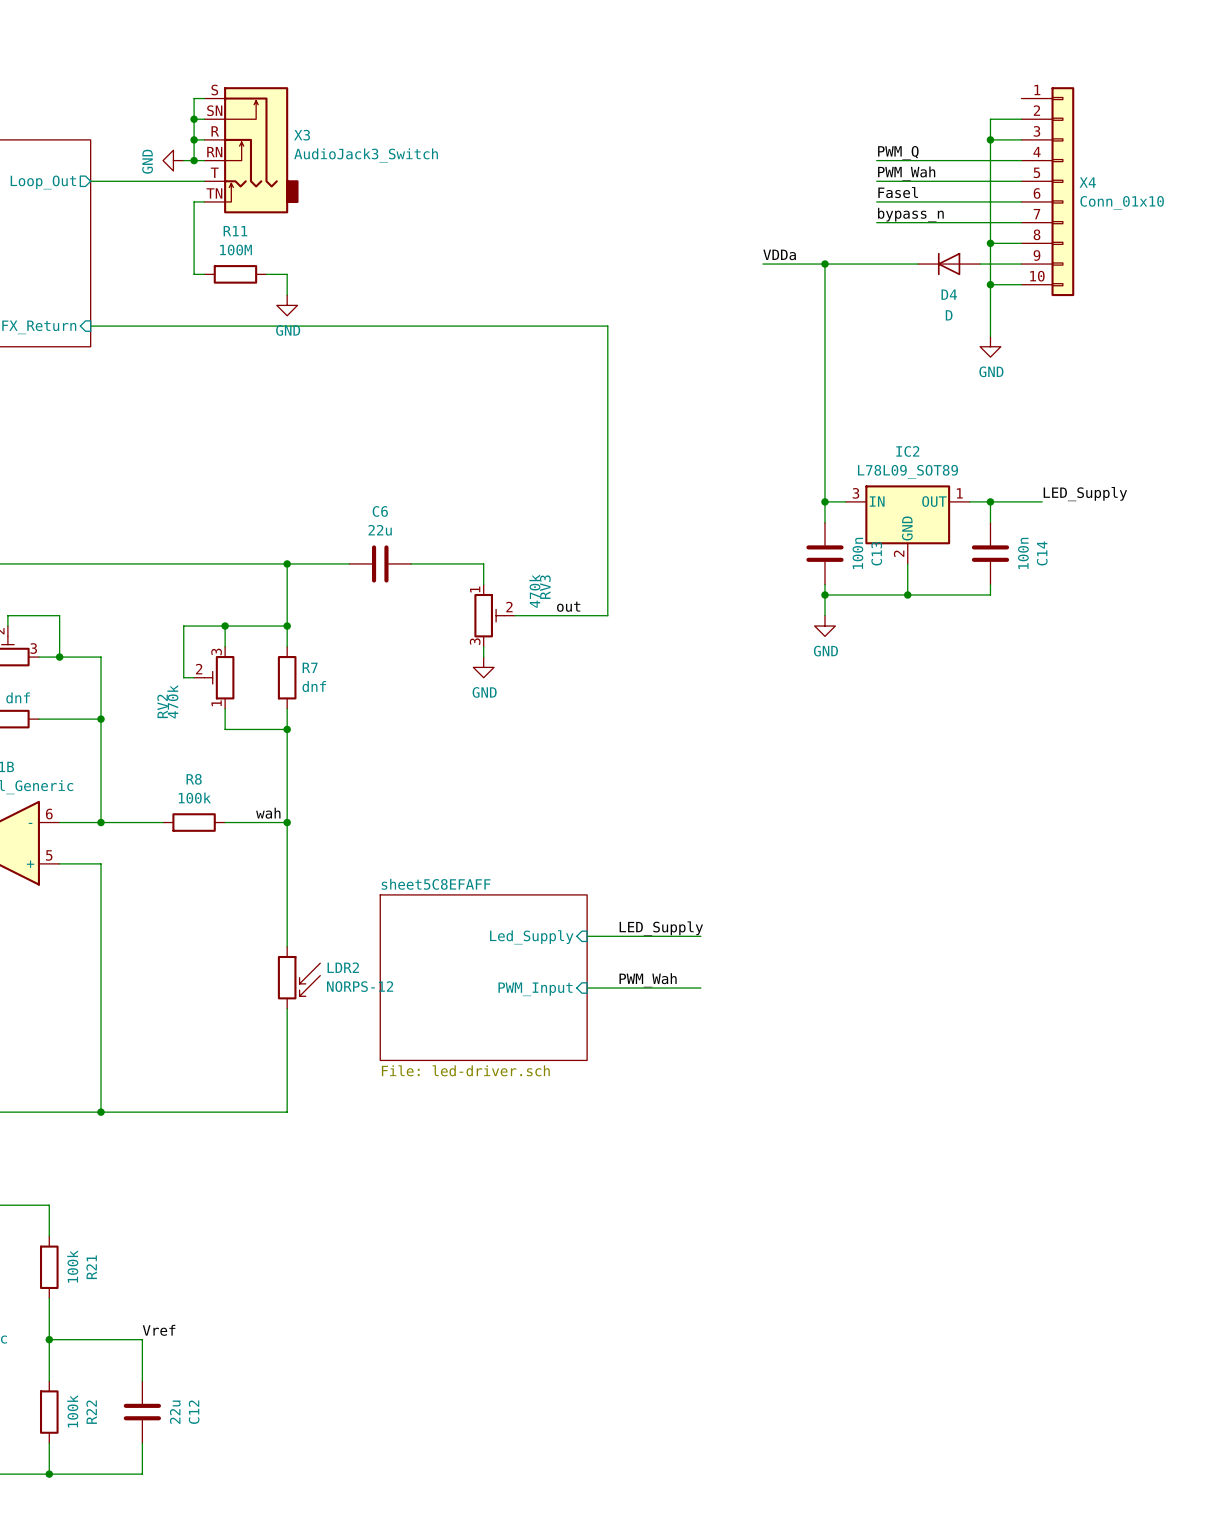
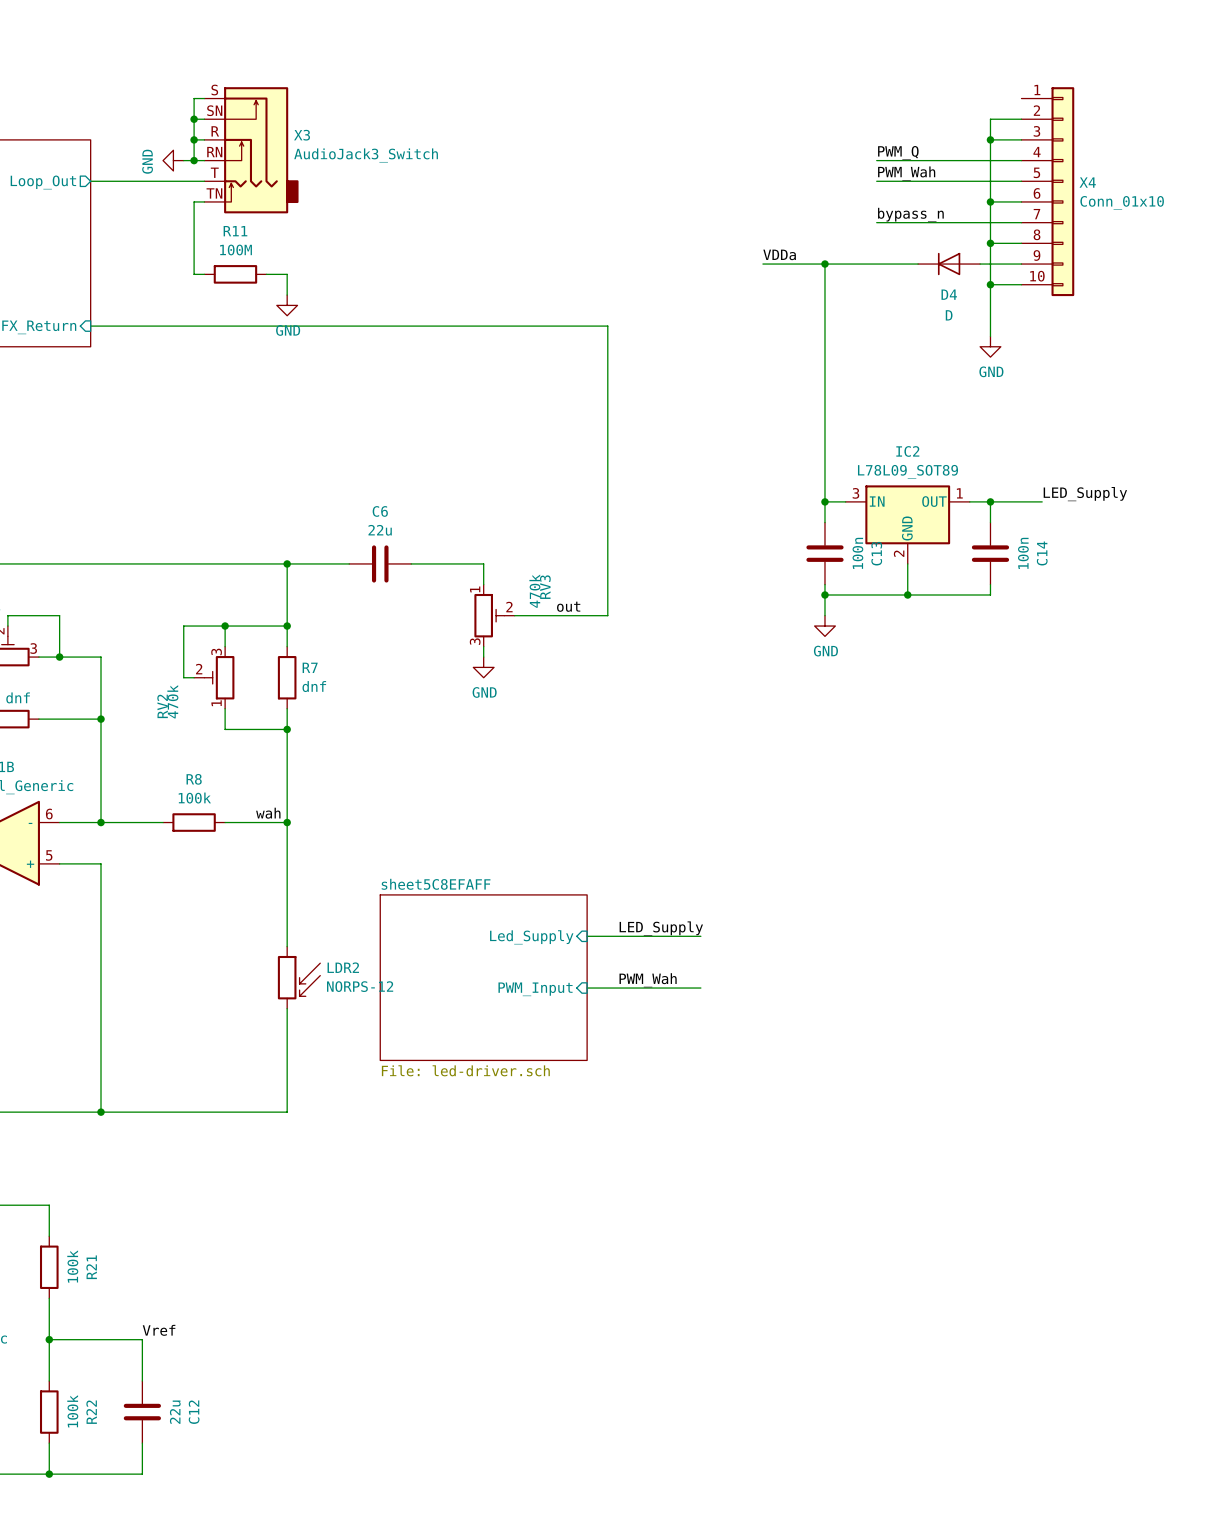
label: Fasel (898, 192) -> none
wire: (876, 201) (990, 201) -> none
junction: none -> (990, 201)

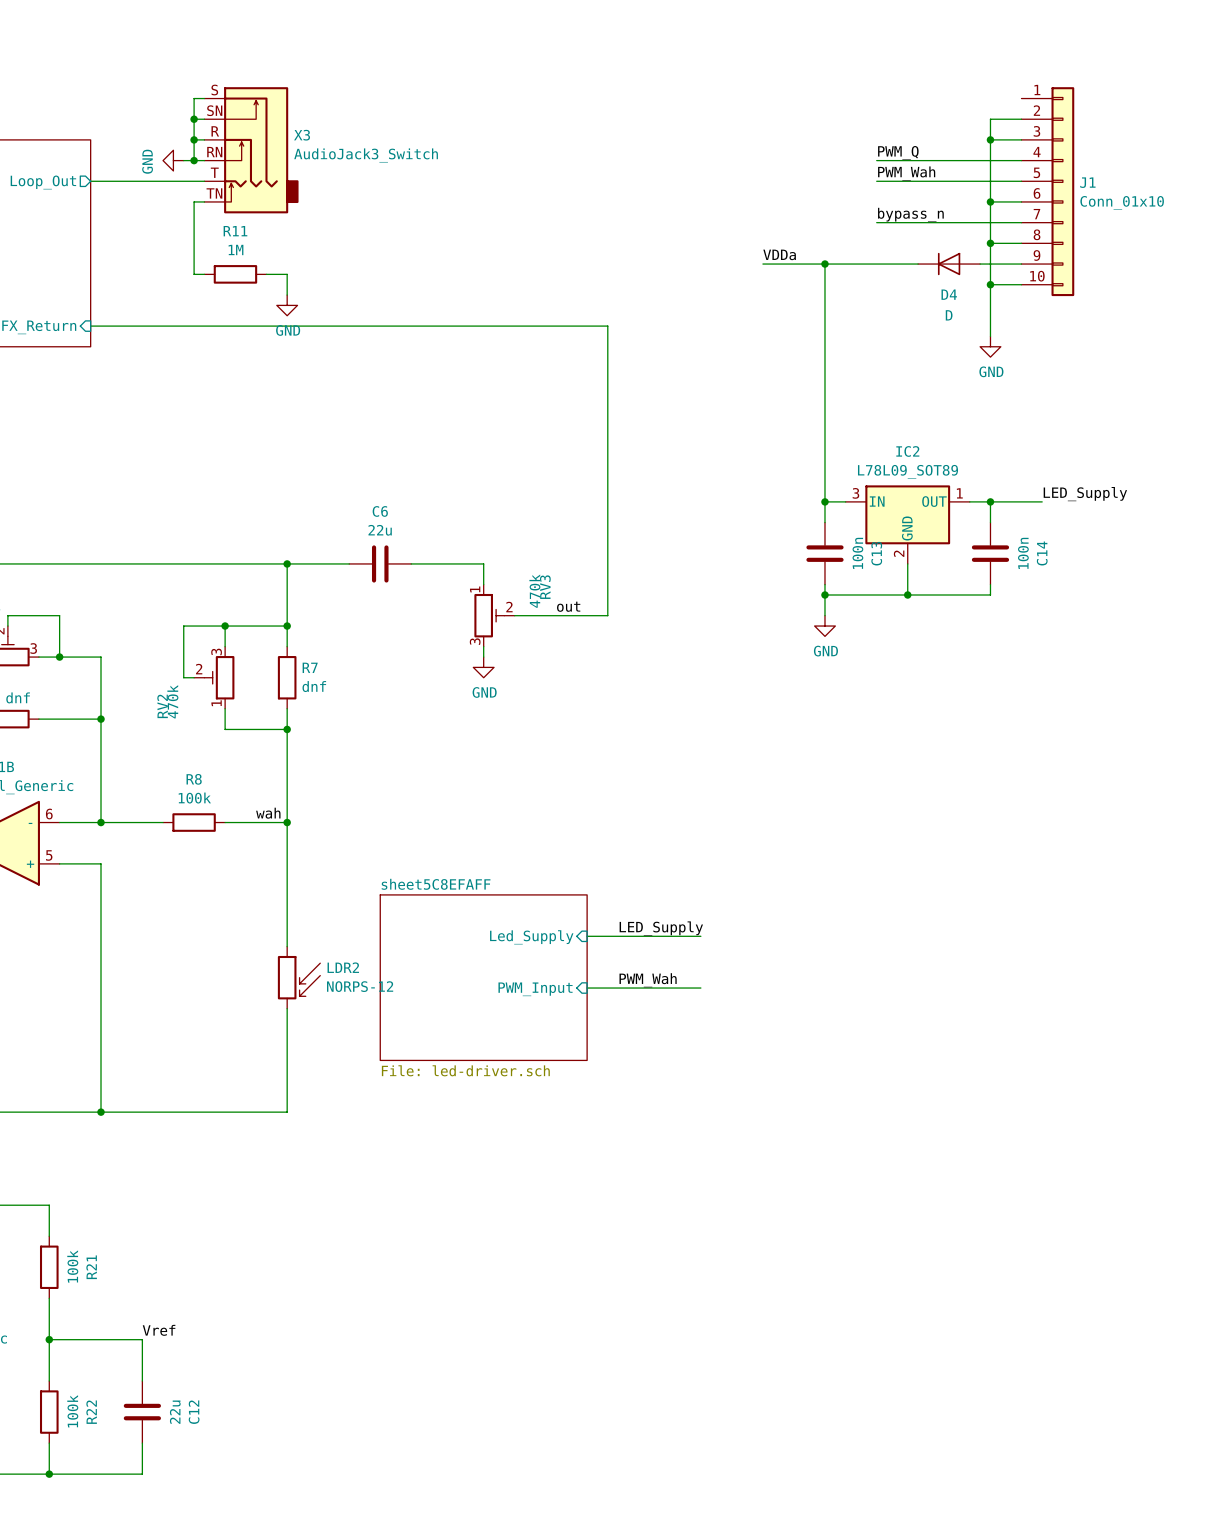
X4 name: X4 (1087, 182) -> J1 (1087, 182)
R11 value: 100M (236, 250) -> 1M (236, 249)

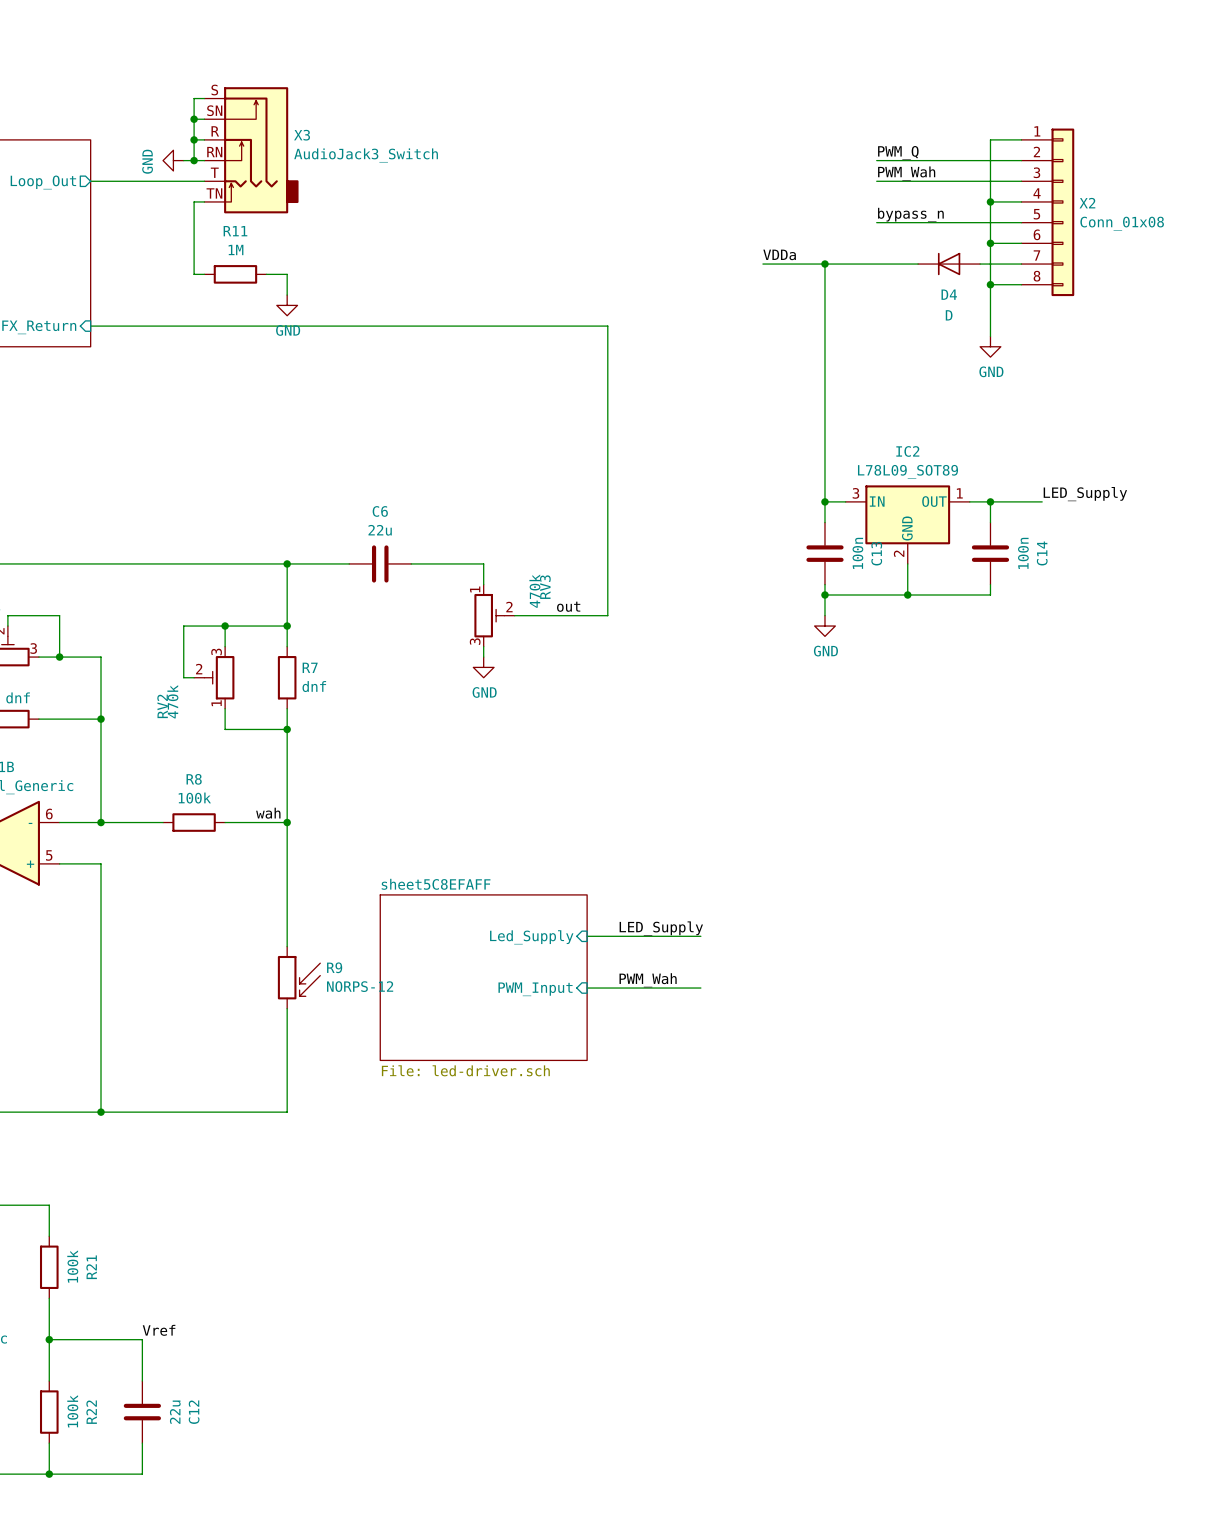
wire: (1021, 119) (990, 119) (990, 139) -> none
junction: (990, 139) -> none
J1: Conn_01x10 (1047, 191) -> none
X2: none -> Conn_01x08 (1047, 212)
LDR2 name: LDR2 (343, 967) -> R9 (334, 967)

